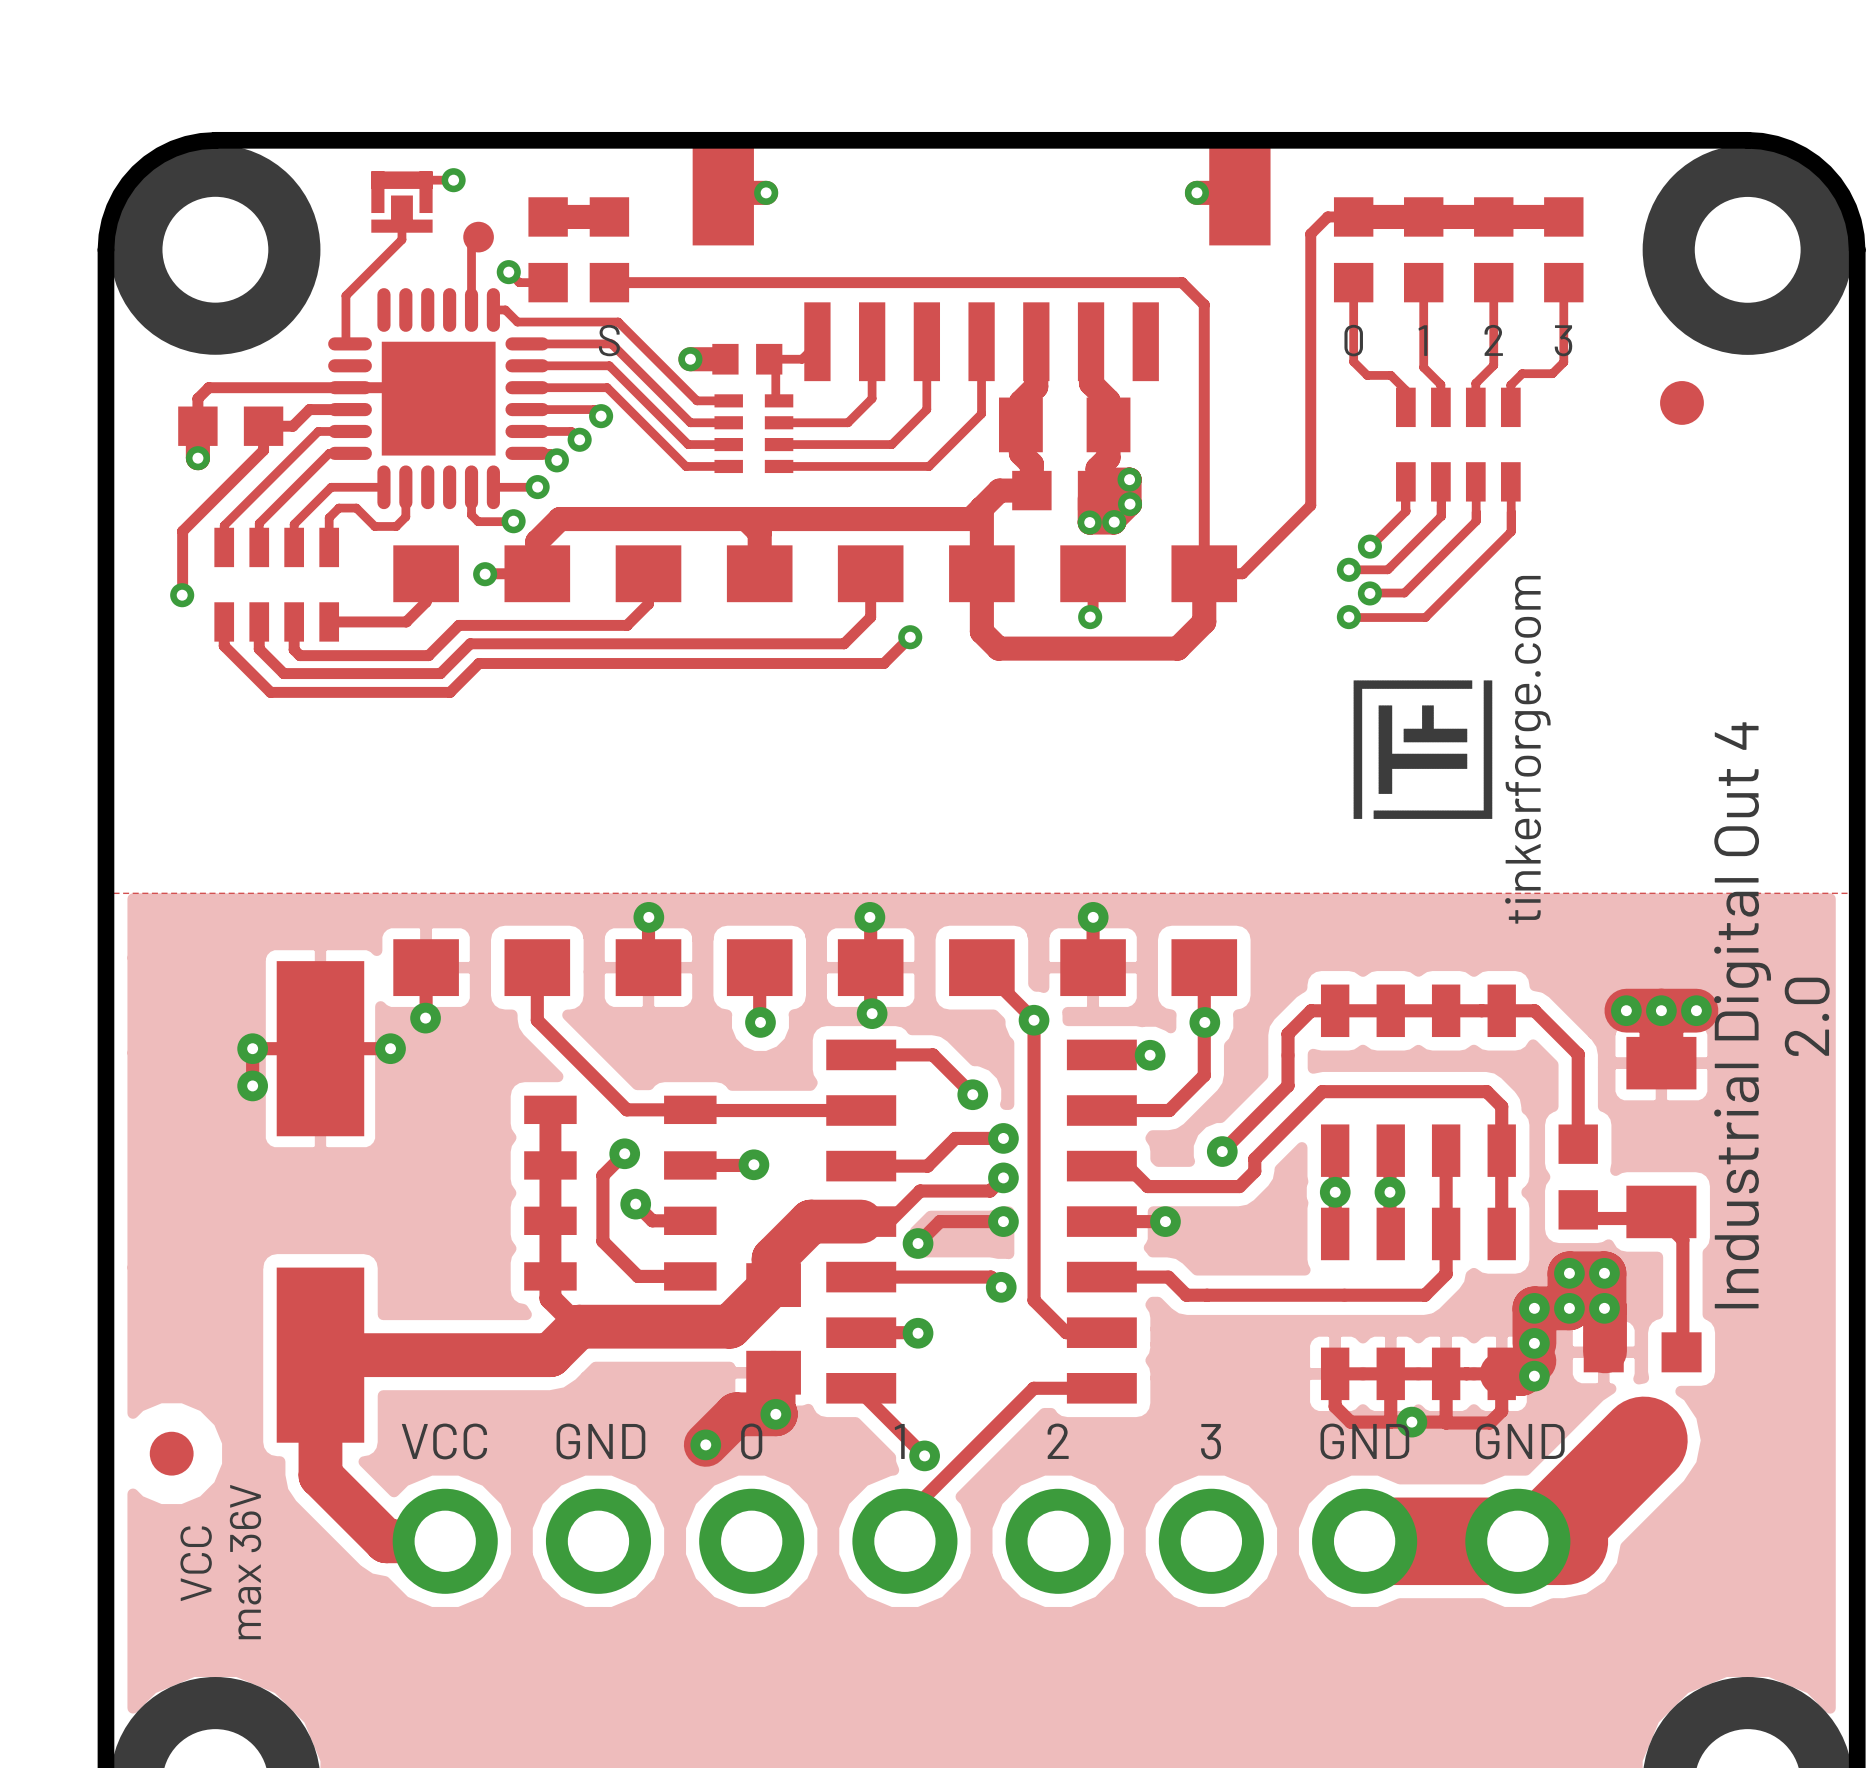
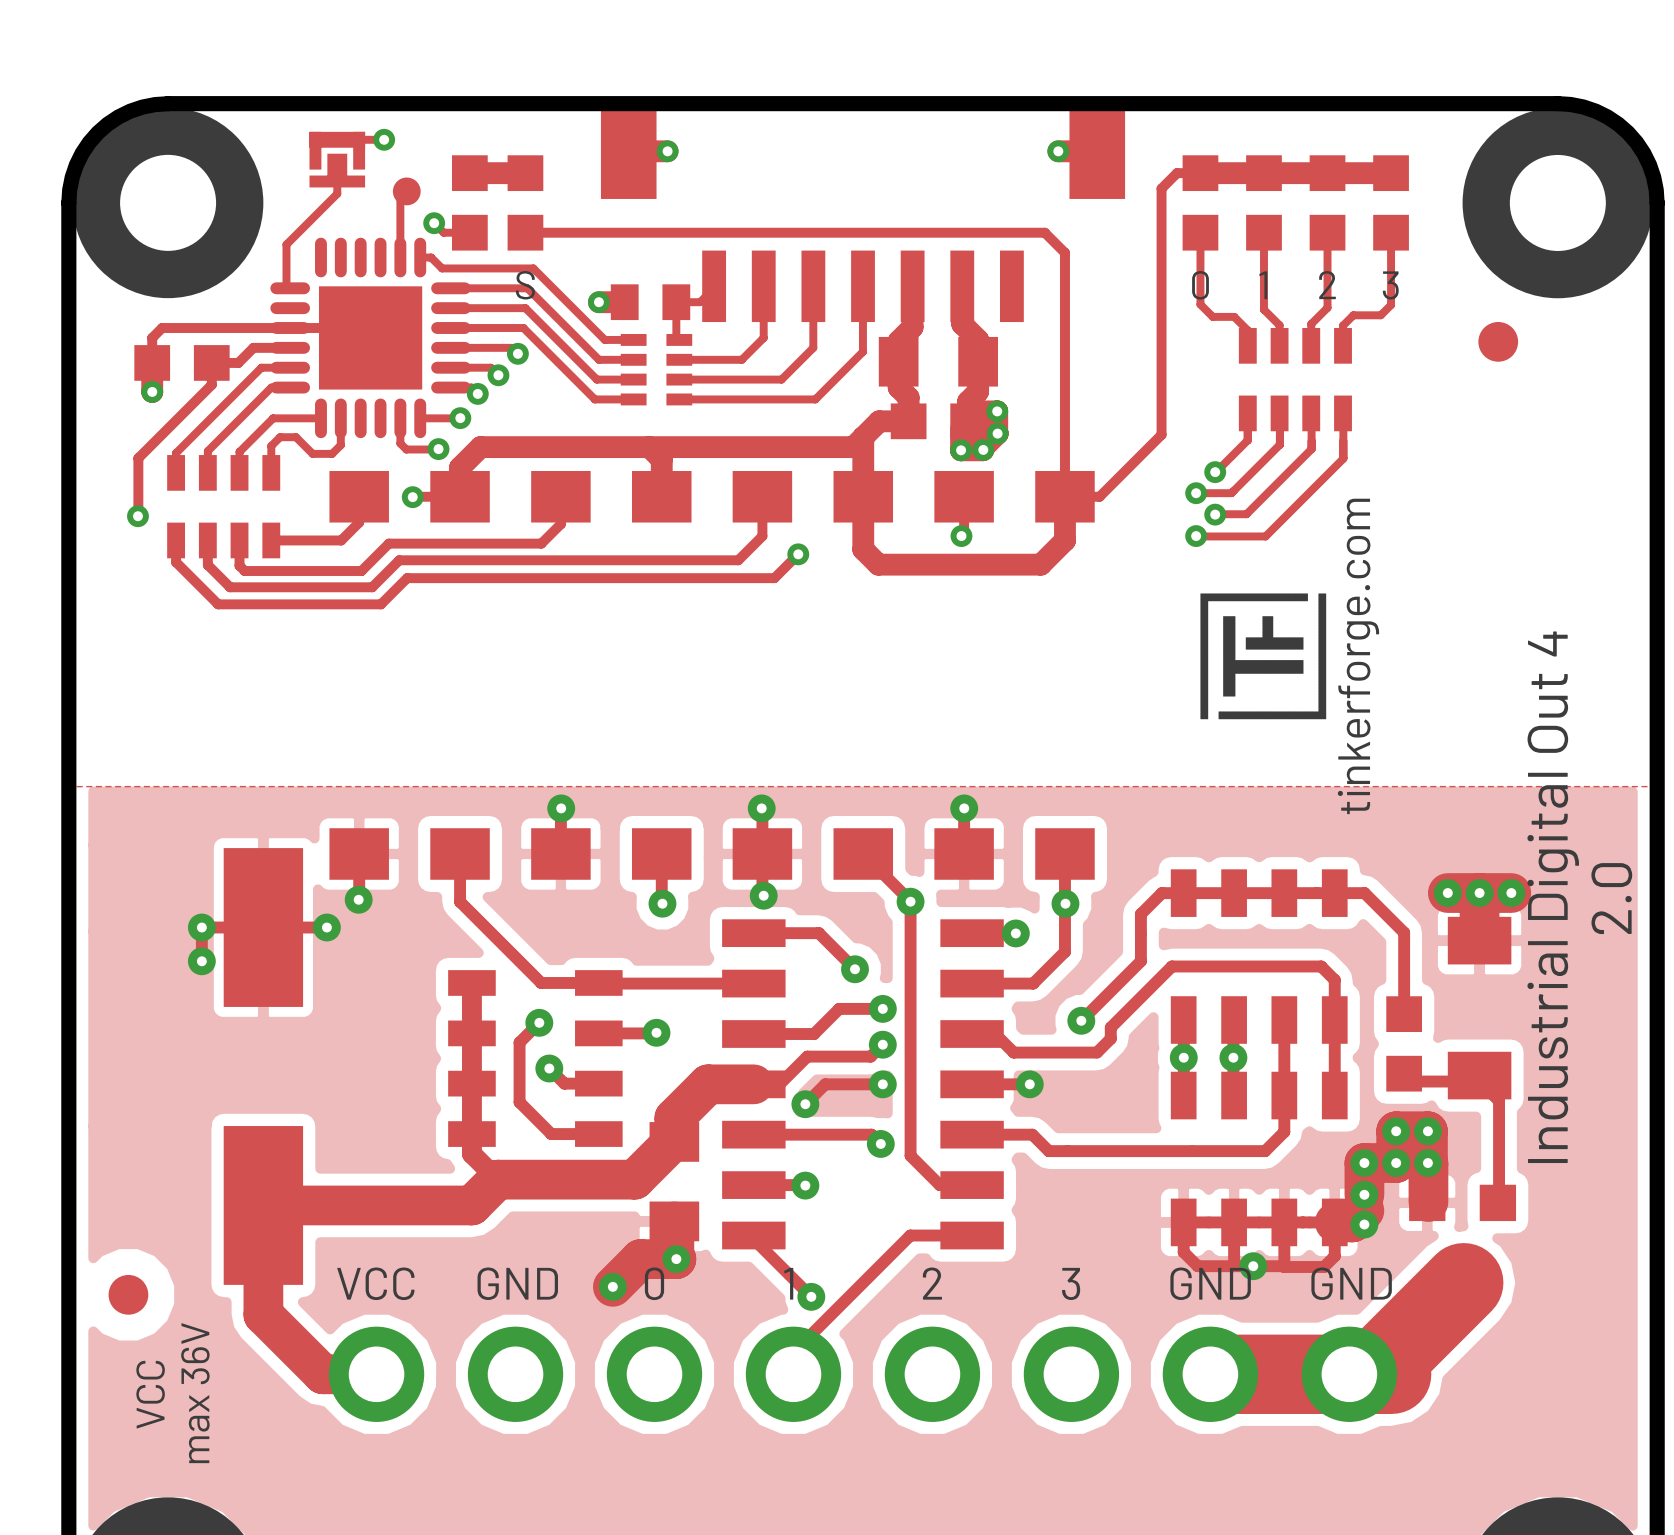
part footprint: [712, 343, 783, 375] -> [610, 284, 691, 321]

